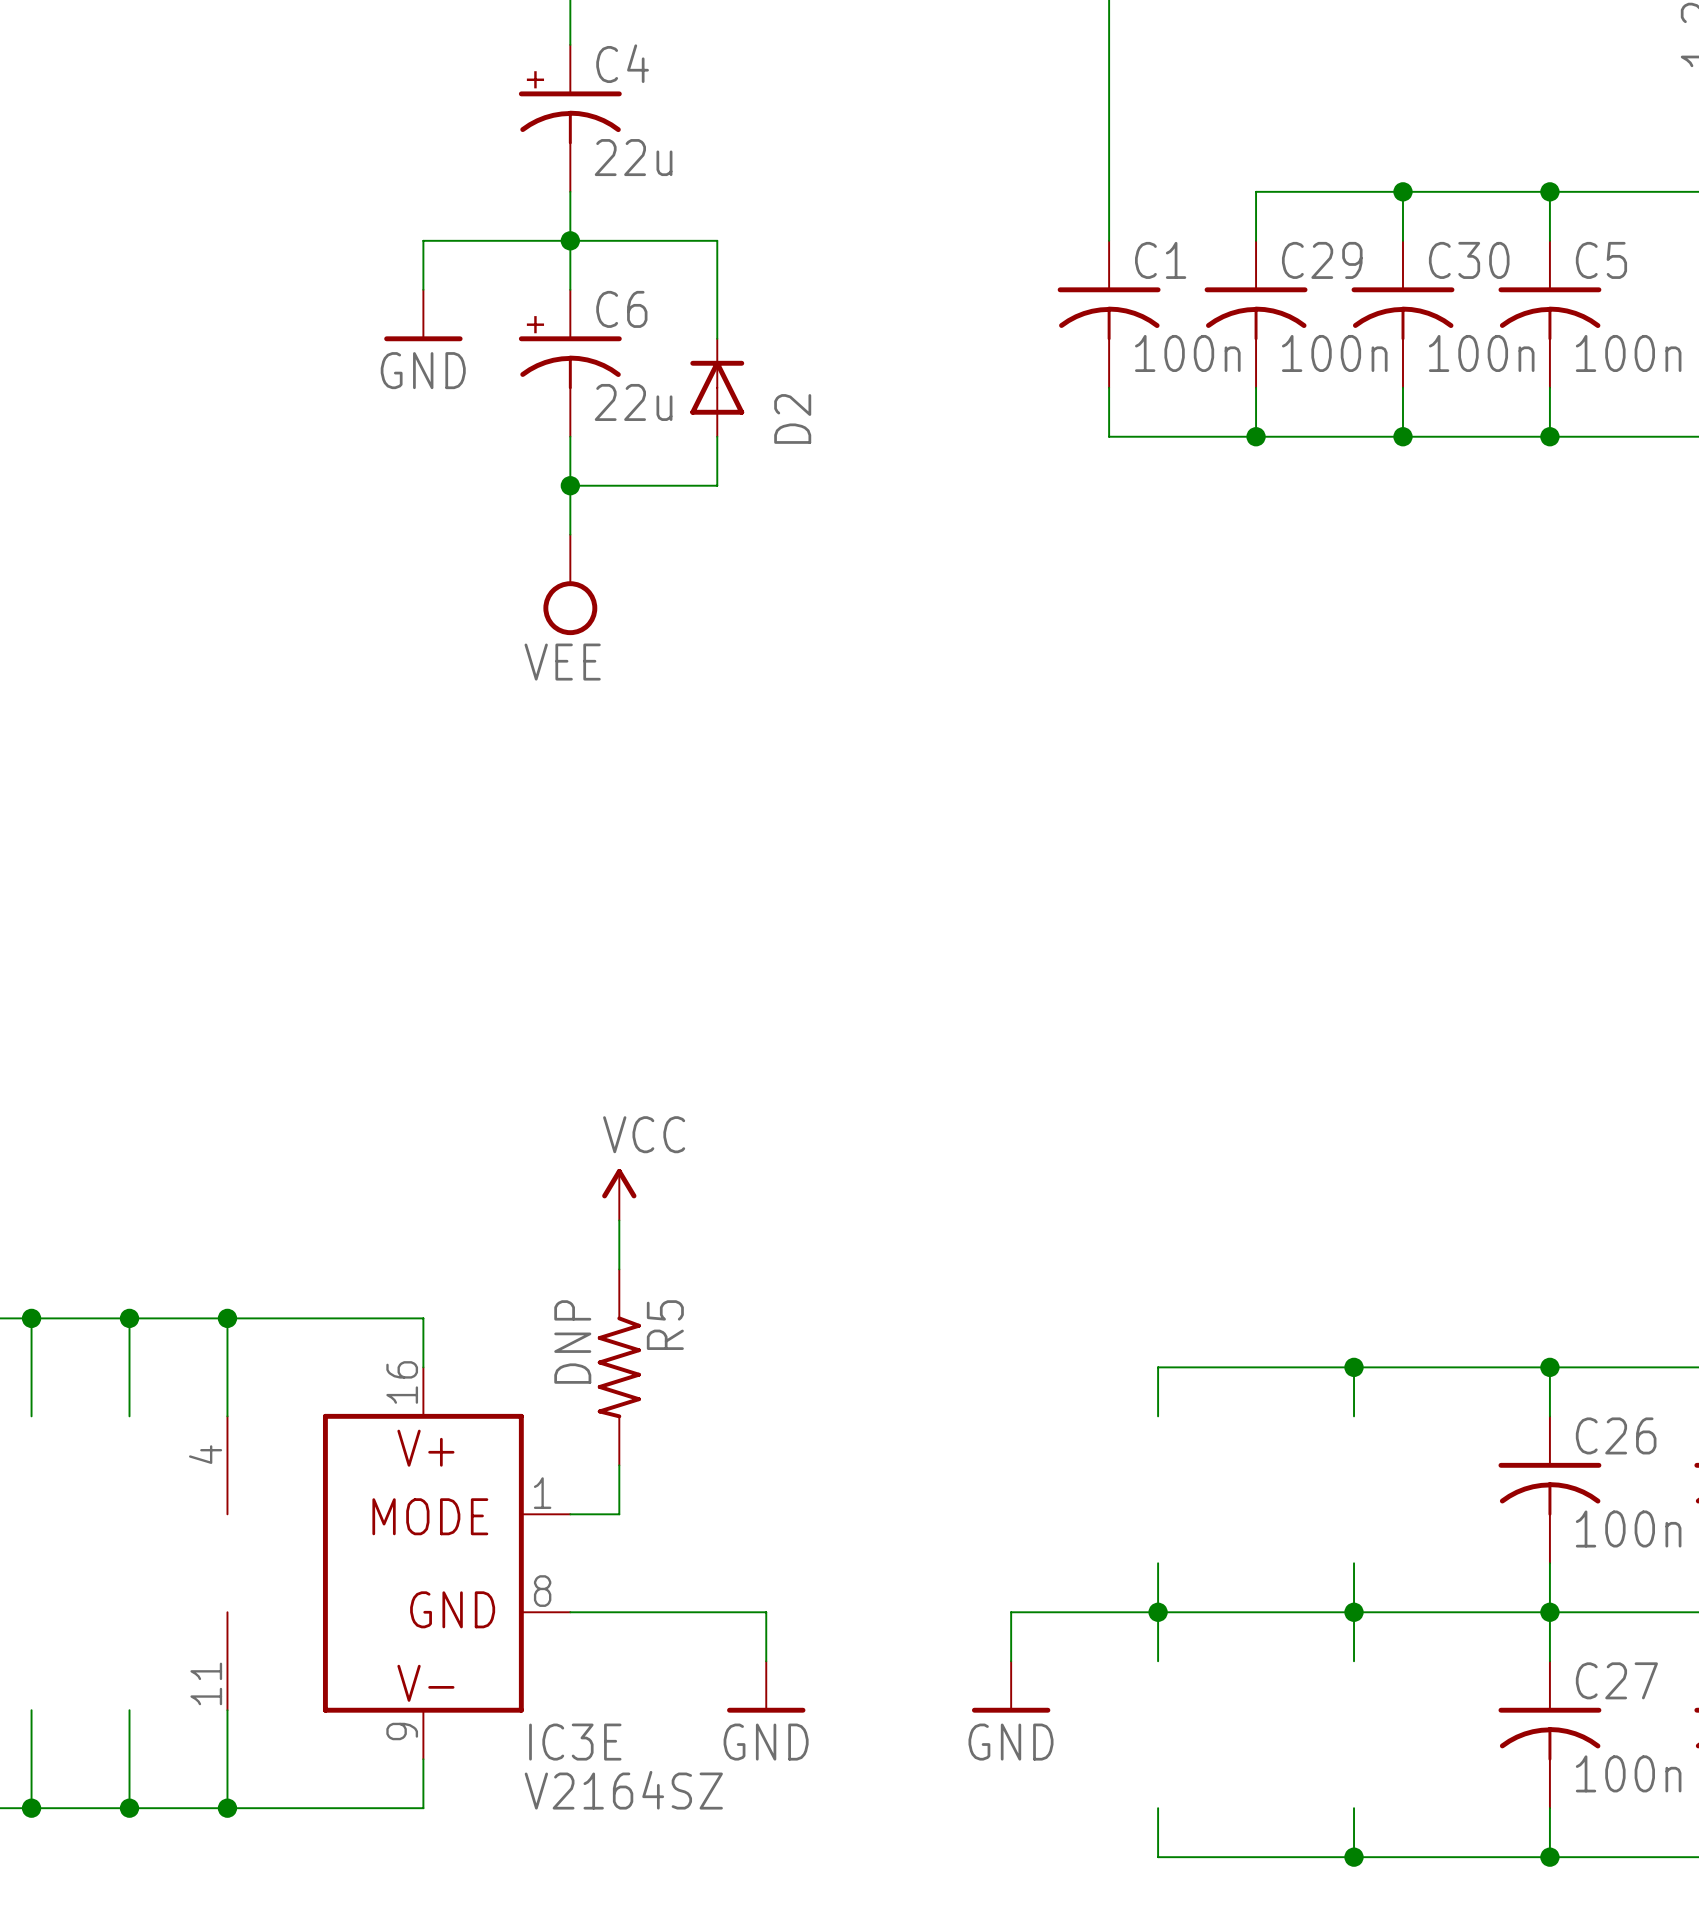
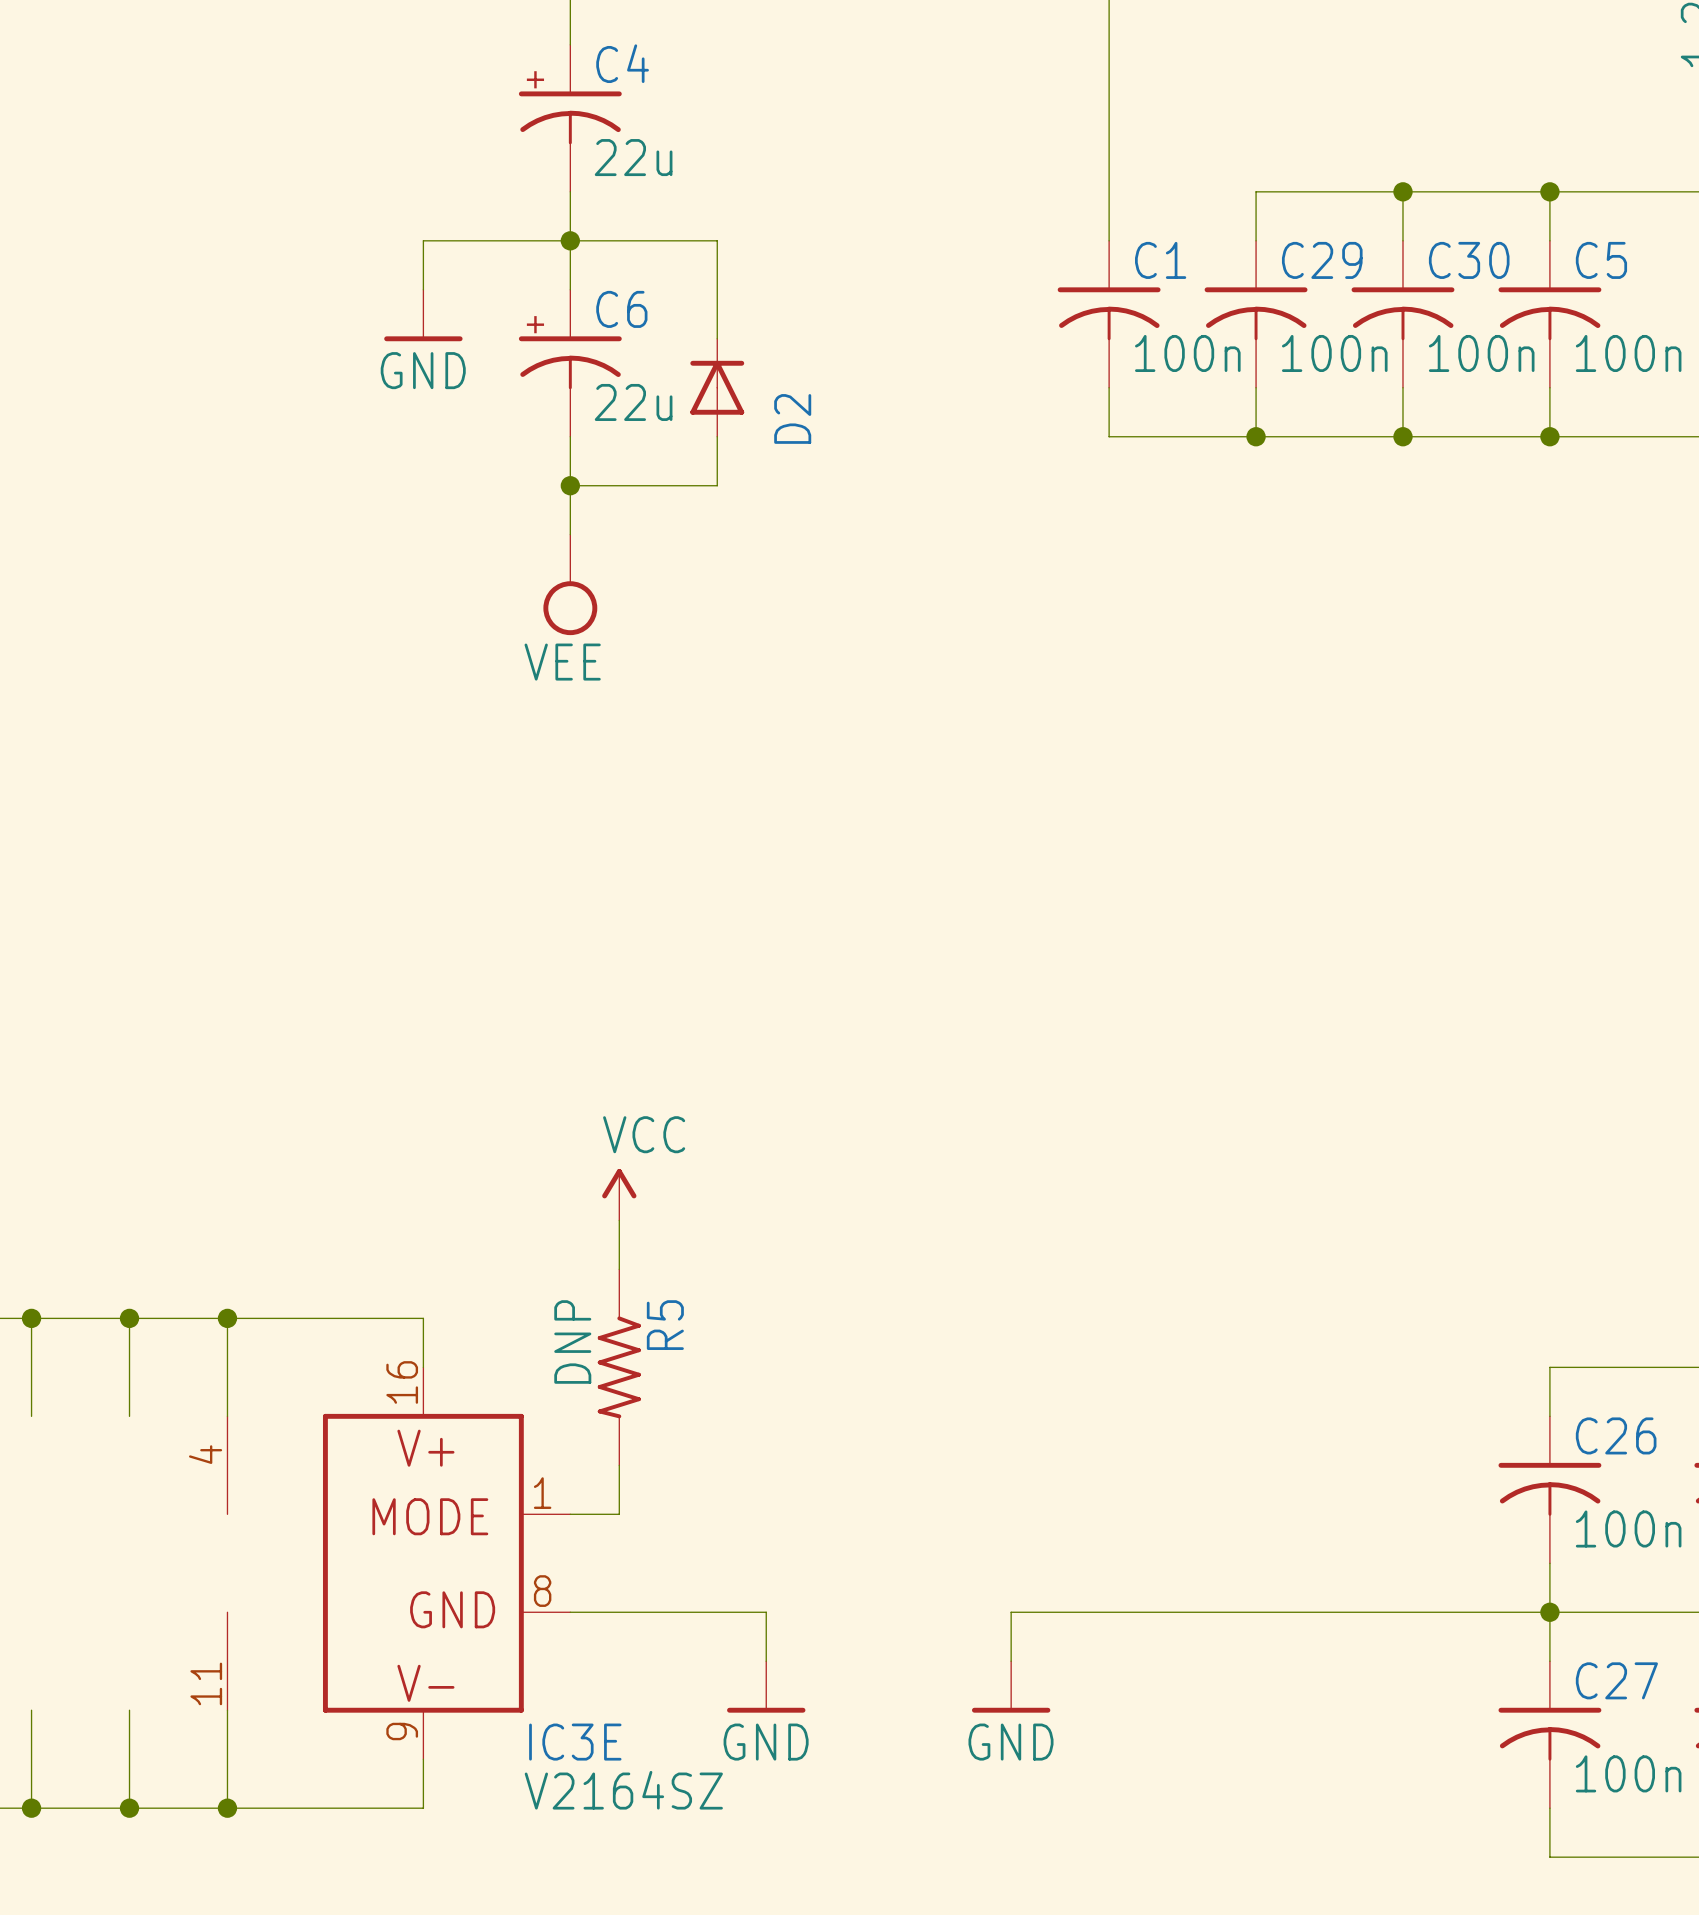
wire: (1354, 1367) (1354, 1416) -> none
junction: (1354, 1367) -> none
wire: (1549, 1367) (1158, 1367) (1158, 1416) -> none
junction: (1549, 1367) -> none
wire: (1158, 1563) (1158, 1661) -> none
wire: (1354, 1563) (1354, 1661) -> none
junction: (1158, 1612) -> none
junction: (1354, 1612) -> none
wire: (1158, 1808) (1158, 1857) (1549, 1857) -> none
wire: (1354, 1808) (1354, 1857) -> none
junction: (1354, 1857) -> none
junction: (1549, 1857) -> none

